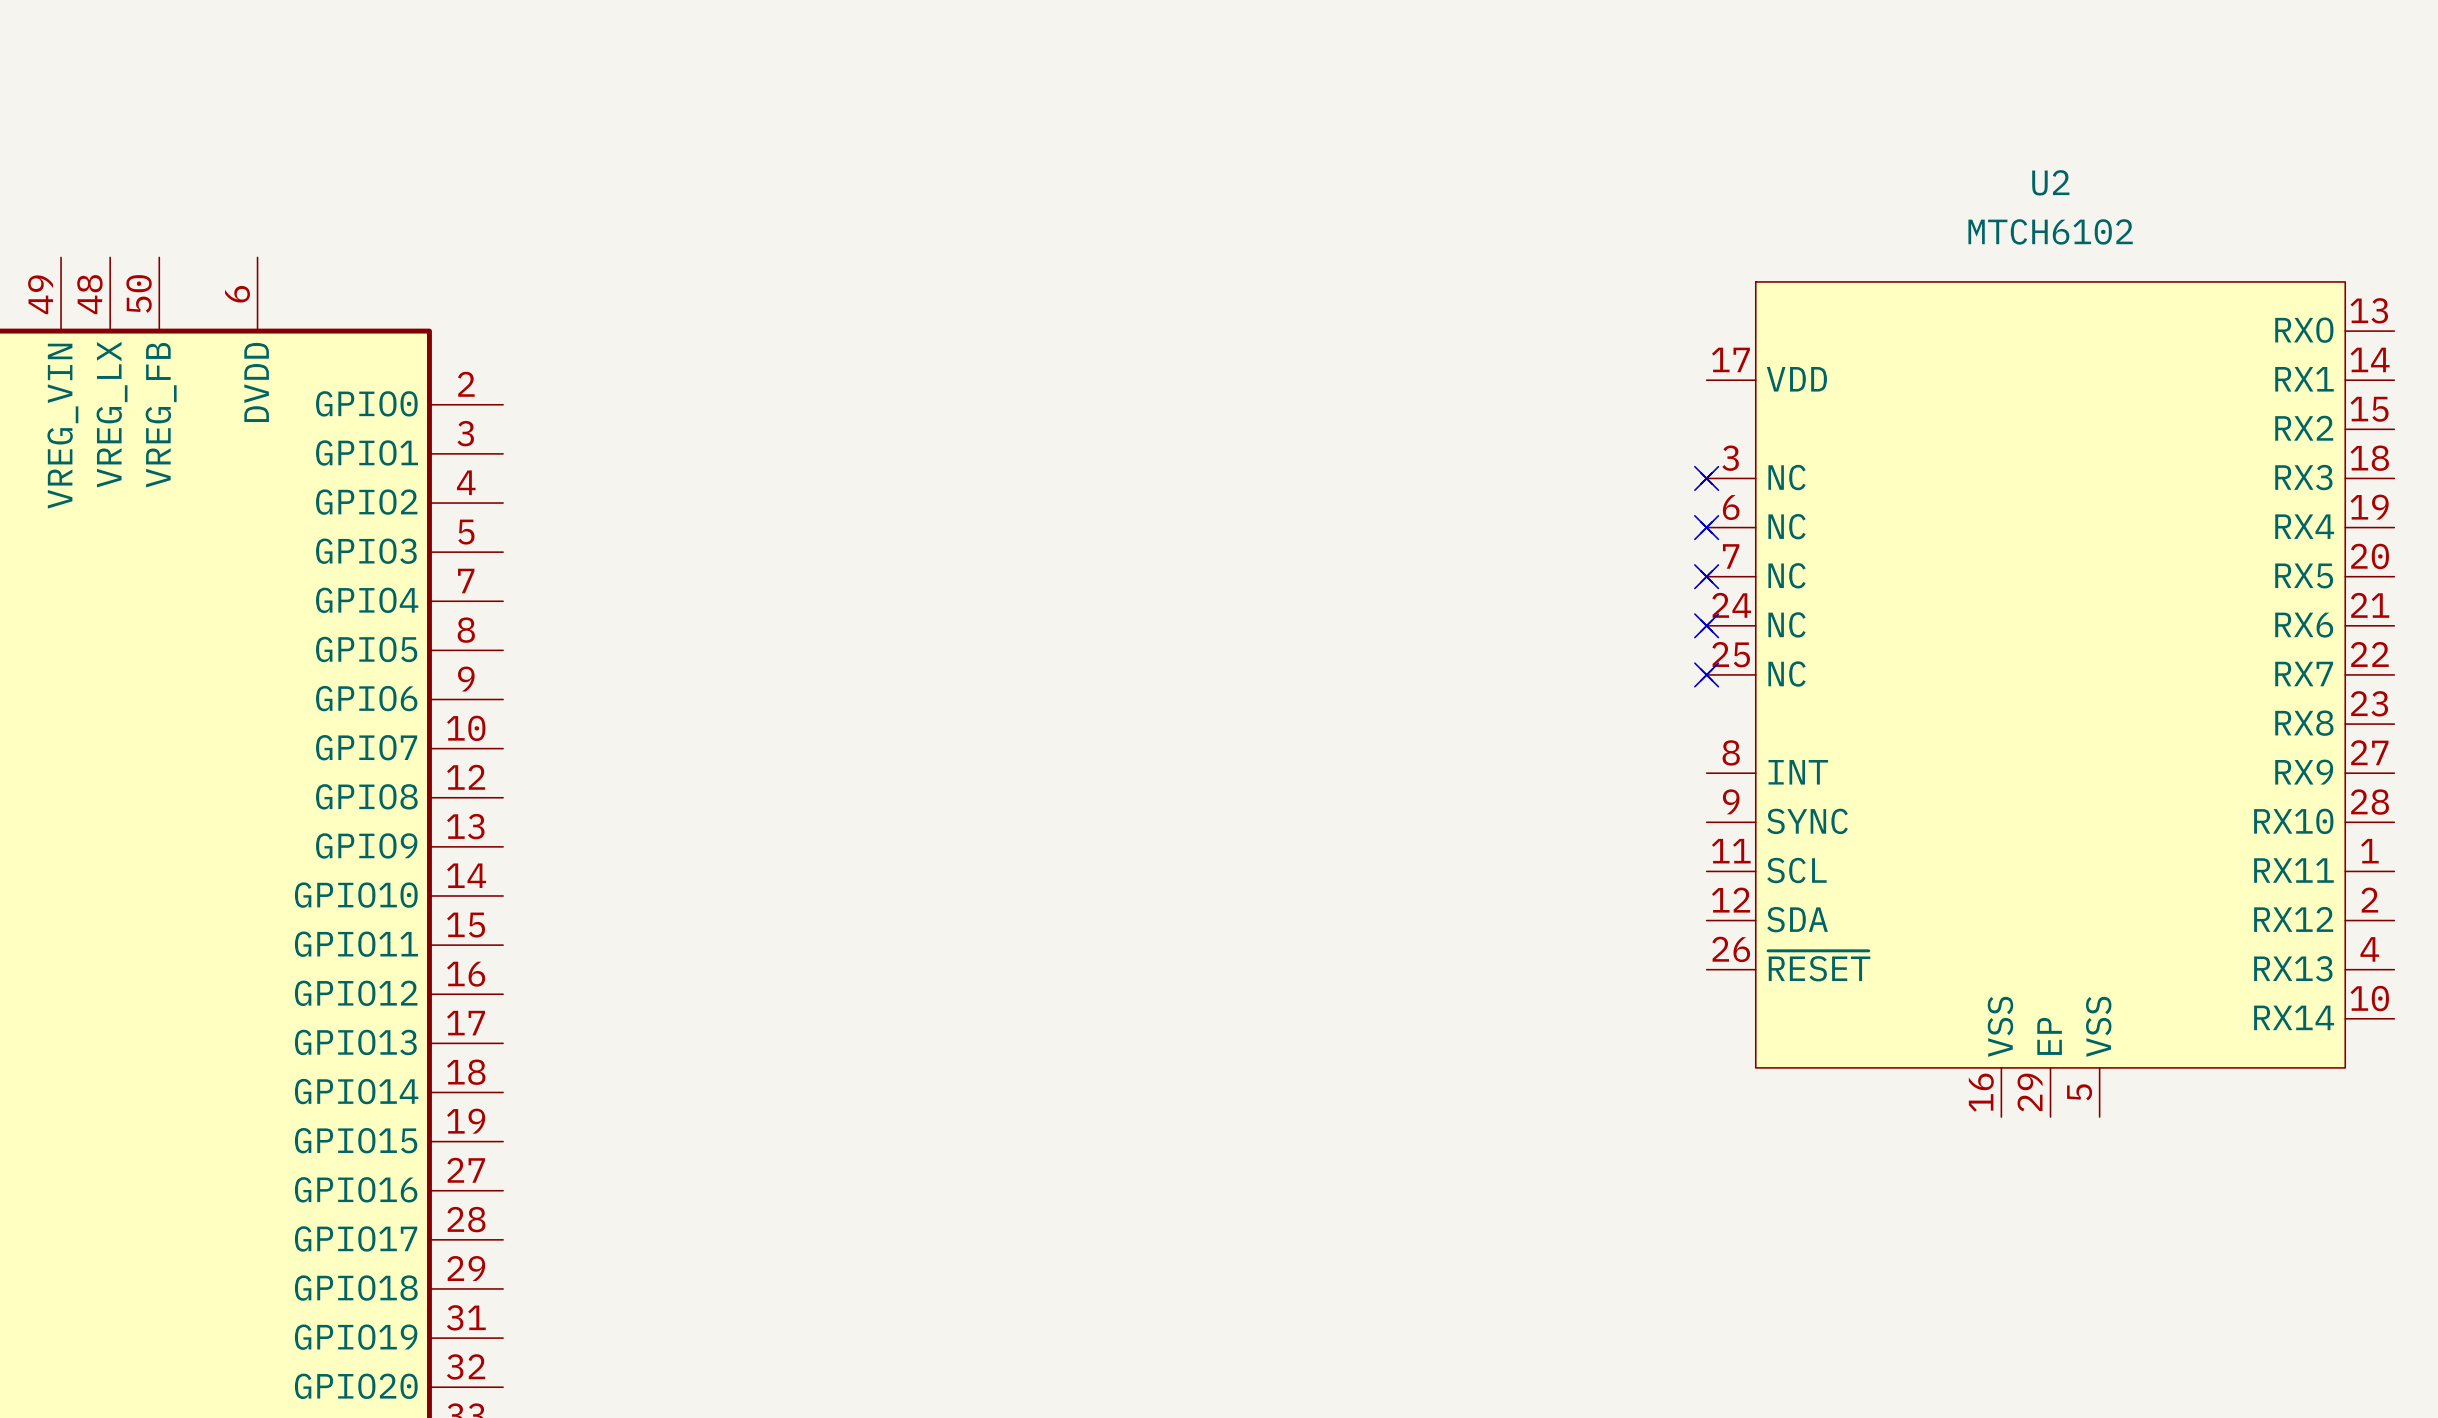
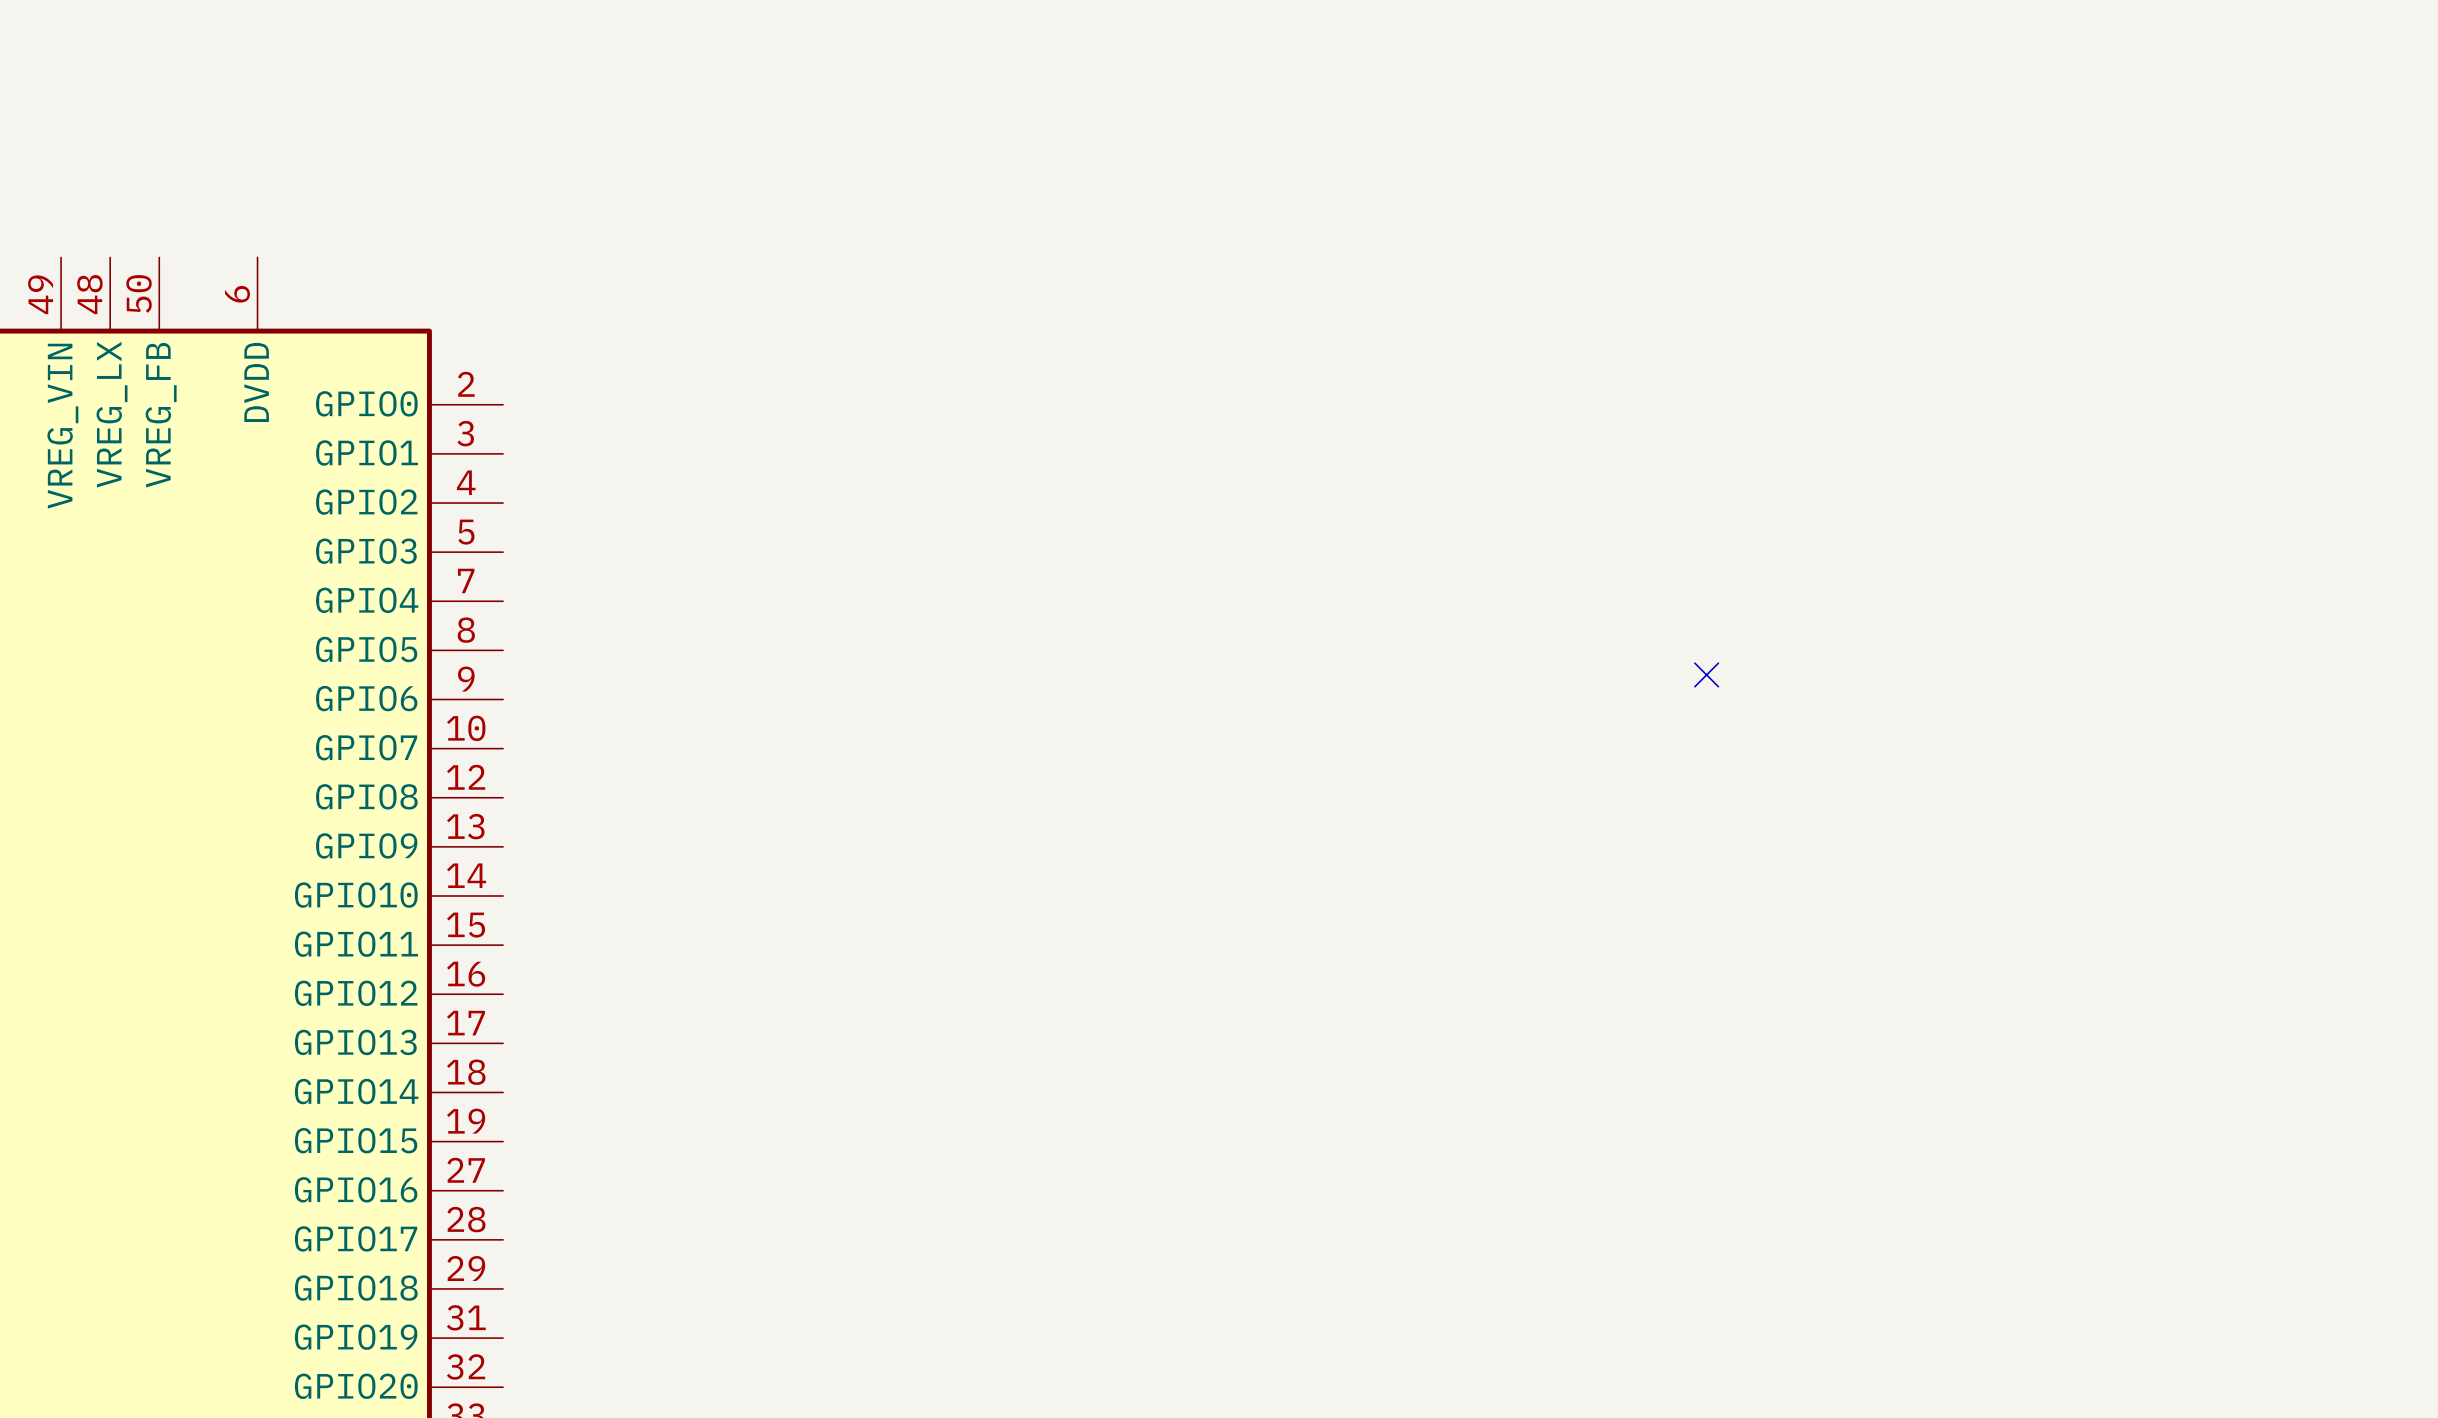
no-connect mark: (1706, 478) -> none
no-connect mark: (1706, 527) -> none
no-connect mark: (1706, 576) -> none
no-connect mark: (1706, 625) -> none
U2: MTCH6102 (2047, 699) -> none

